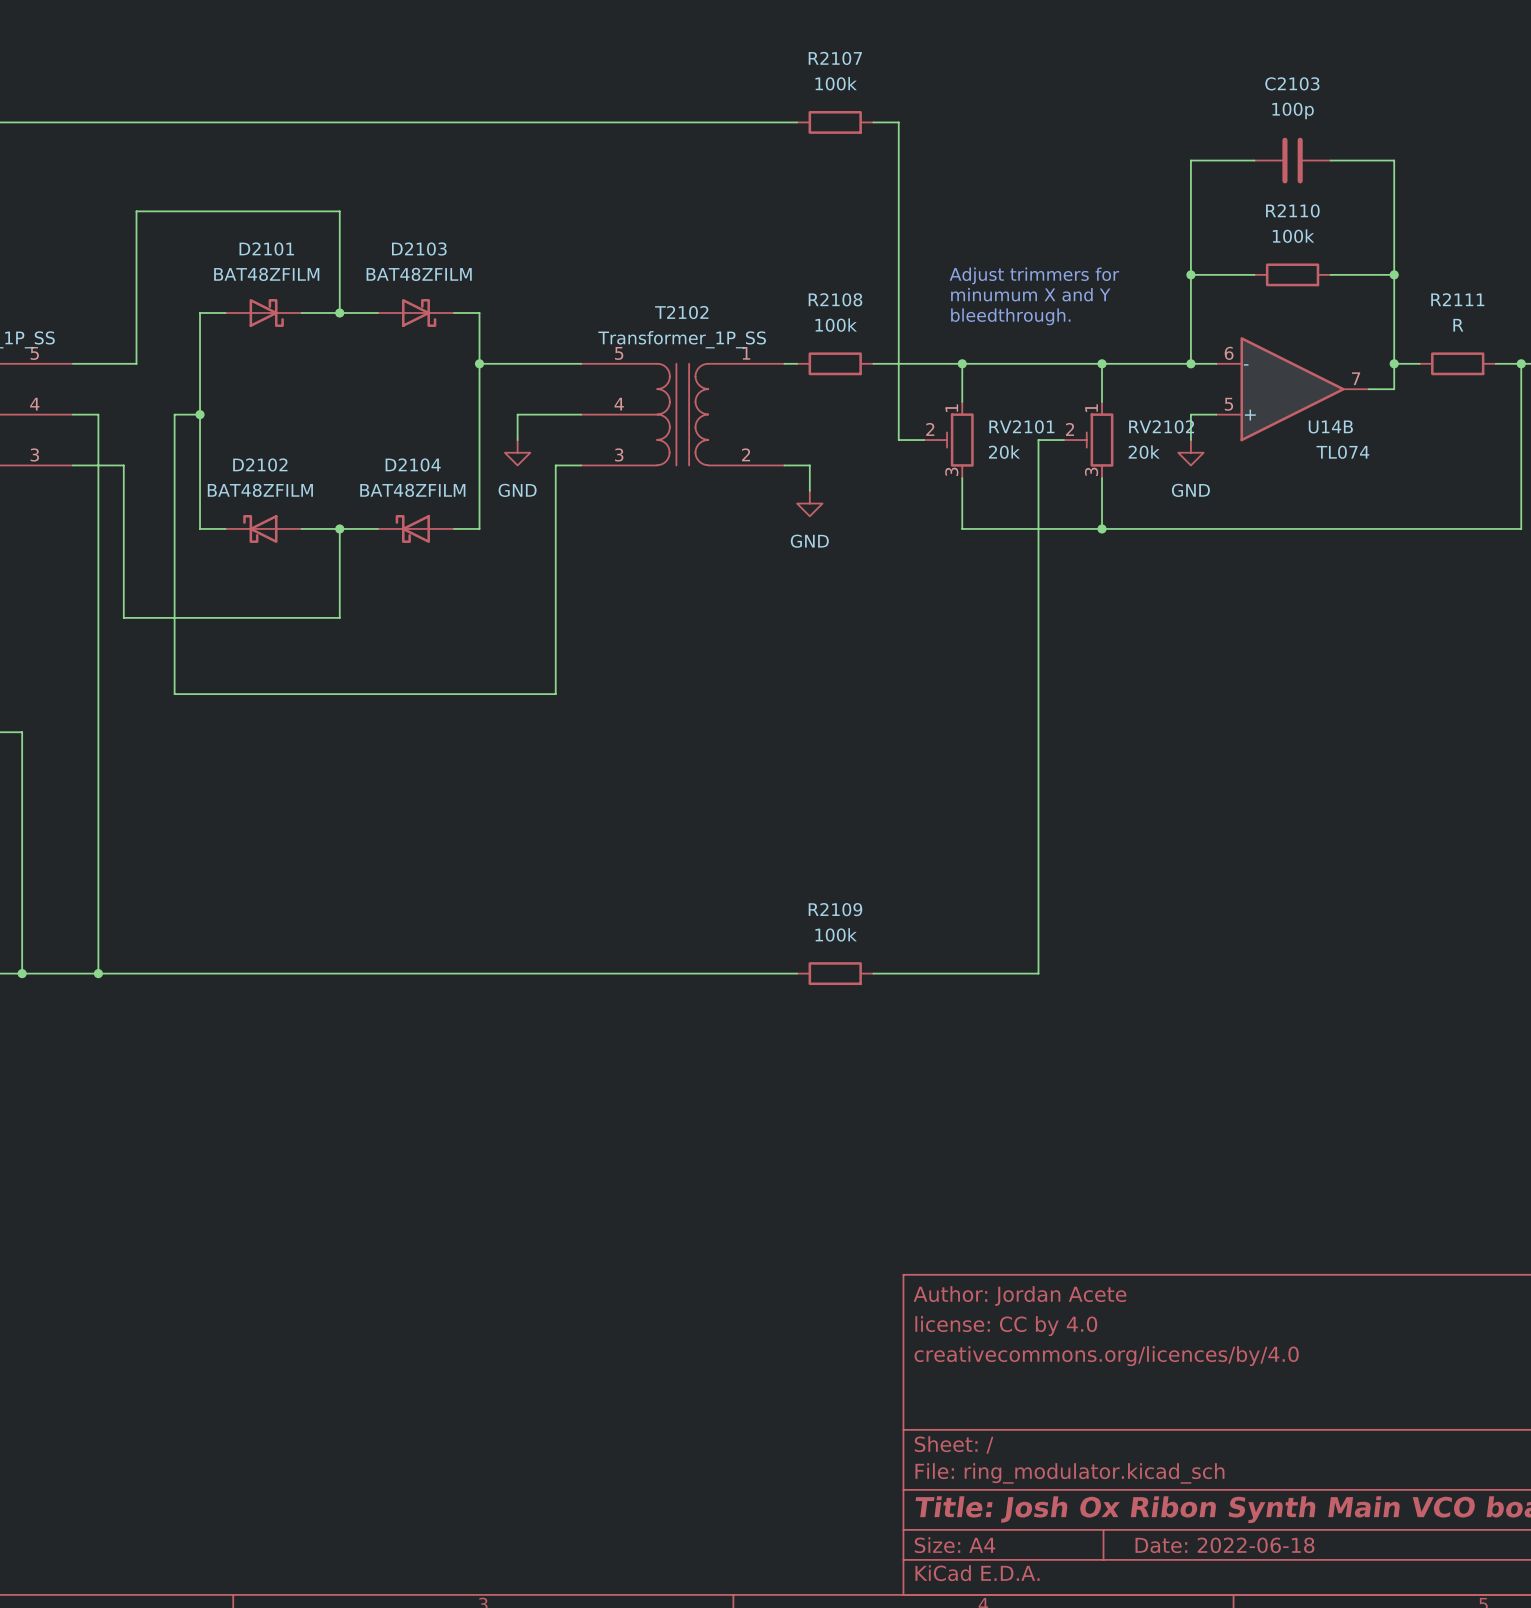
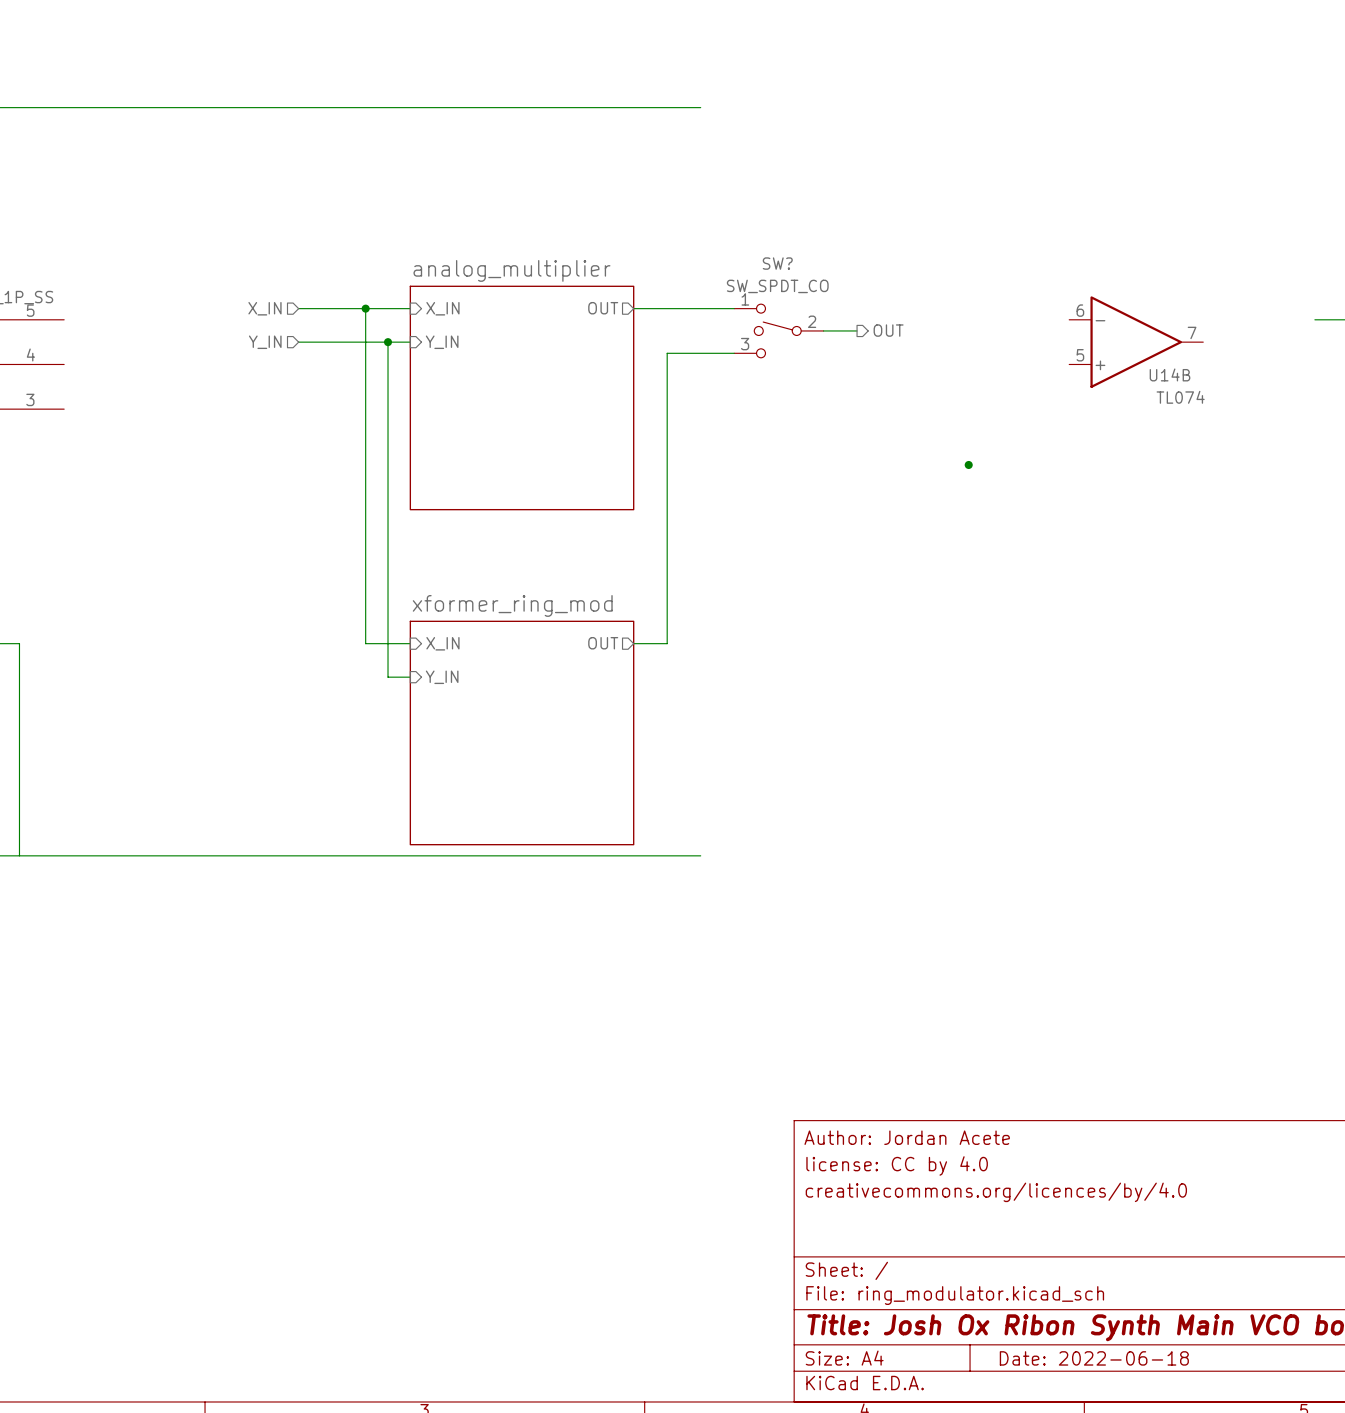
R2107: 100k (835, 122) -> none
wire: (873, 122) (898, 122) (898, 440) (924, 440) -> none
wire: (1254, 160) (1190, 160) (1190, 363) -> none
C2103: 100p (1292, 160) -> none
wire: (1330, 160) (1394, 160) (1394, 389) (1368, 389) -> none
wire: (1190, 274) (1254, 274) -> none
junction: (1190, 274) -> none
R2110: 100k (1292, 274) -> none
wire: (1330, 274) (1394, 274) -> none
junction: (1394, 274) -> none
text: Adjust trimmers for (1034, 275) -> none
text: minumum X and Y (1030, 294) -> none
wire: (225, 312) (200, 312) (200, 528) (225, 528) -> none
D2101: BAT48ZFILM (263, 312) -> none
wire: (301, 312) (377, 312) -> none
wire: (339, 312) (339, 211) (136, 211) (136, 363) (72, 363) -> none
junction: (339, 312) -> none
D2103: BAT48ZFILM (415, 312) -> none
wire: (454, 312) (479, 312) (479, 528) (454, 528) -> none
text: bleedthrough. (1010, 316) -> none
sheet pin: none -> OUT (603, 308)
wire: none -> (298, 308) (410, 308)
wire: none -> (365, 308) (365, 643) (410, 643)
junction: none -> (365, 308)
wire: none -> (633, 308) (734, 308)
hierarchical label: none -> X_IN (264, 308)
sheet pin: none -> X_IN (442, 308)
wire: (479, 363) (581, 363) -> none
junction: (479, 363) -> none
wire: (784, 363) (797, 363) -> none
R2108: 100k (835, 363) -> none
wire: (873, 363) (1216, 363) -> none
wire: (962, 363) (962, 401) -> none
junction: (962, 363) -> none
wire: (1102, 363) (1102, 401) -> none
junction: (1102, 363) -> none
junction: (1190, 363) -> none
wire: (1394, 363) (1419, 363) -> none
junction: (1394, 363) -> none
R2111: R (1457, 363) -> none
wire: (1521, 363) (1521, 528) (962, 528) (962, 478) -> none
junction: (1521, 363) -> none
SW?: none -> SW_SPDT_CO (778, 330)
wire: none -> (823, 330) (857, 330)
hierarchical label: none -> OUT (888, 330)
wire: none -> (298, 342) (410, 342)
wire: none -> (388, 342) (388, 677) (410, 677)
junction: none -> (388, 342)
hierarchical label: none -> Y_IN (265, 342)
sheet pin: none -> Y_IN (442, 342)
wire: none -> (734, 353) (667, 353) (667, 643) (633, 643)
wire: (72, 414) (98, 414) (98, 973) -> none
wire: (200, 414) (174, 414) (174, 694) (555, 694) (555, 465) (581, 465) -> none
junction: (200, 414) -> none
wire: (581, 414) (517, 414) (517, 440) -> none
T2102: Transformer_1P_SS (682, 414) -> none
wire: (1216, 414) (1190, 414) (1190, 440) -> none
RV2101: 20k (948, 440) -> none
wire: (1063, 440) (1038, 440) (1038, 973) (873, 973) -> none
RV2102: 20k (1088, 440) -> none
power symbol: GND (517, 452) -> none
sheet analog_multiplier: none -> (522, 397)
power symbol: GND (1190, 452) -> none
wire: (72, 465) (123, 465) (123, 617) (339, 617) (339, 528) -> none
wire: (784, 465) (809, 465) (809, 490) -> none
wire: (1102, 478) (1102, 528) -> none
power symbol: GND (809, 503) -> none
D2102: BAT48ZFILM (263, 528) -> none
wire: (301, 528) (377, 528) -> none
junction: (339, 528) -> none
D2104: BAT48ZFILM (415, 528) -> none
sheet pin: none -> OUT (603, 643)
sheet pin: none -> X_IN (442, 643)
sheet pin: none -> Y_IN (442, 677)
sheet xformer_ring_mod: none -> (522, 733)
junction: (22, 973) -> none
junction: (98, 973) -> none
R2109: 100k (835, 973) -> none

